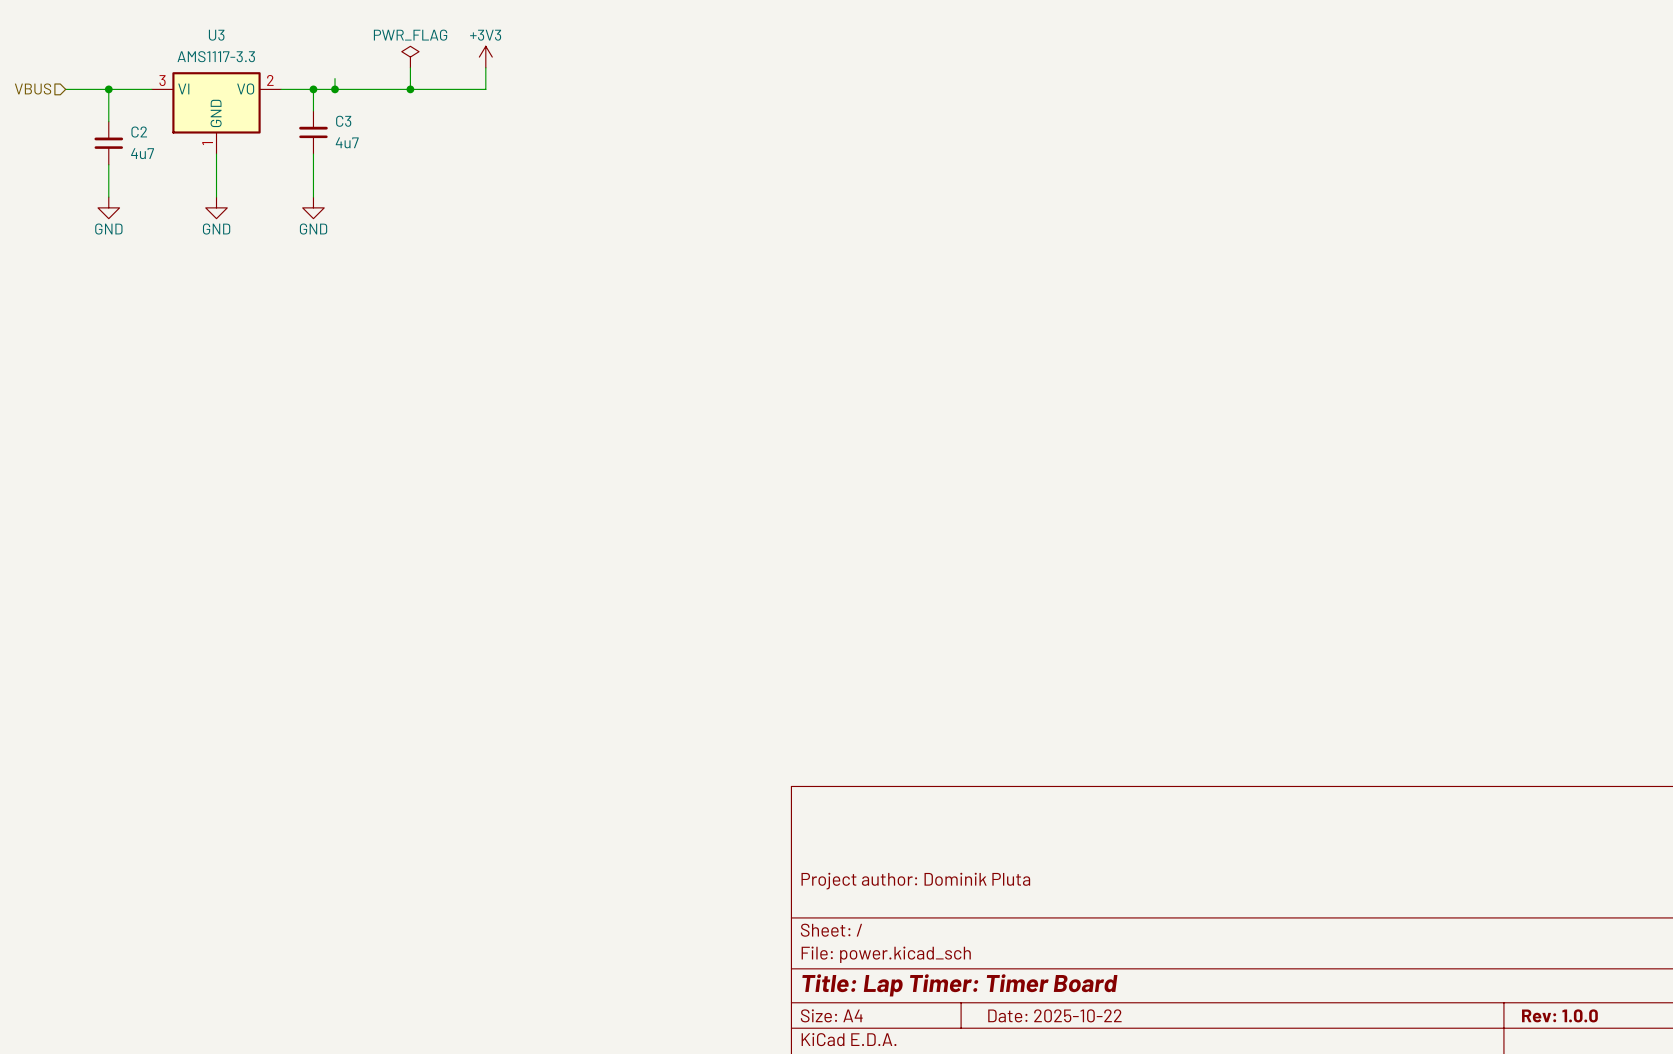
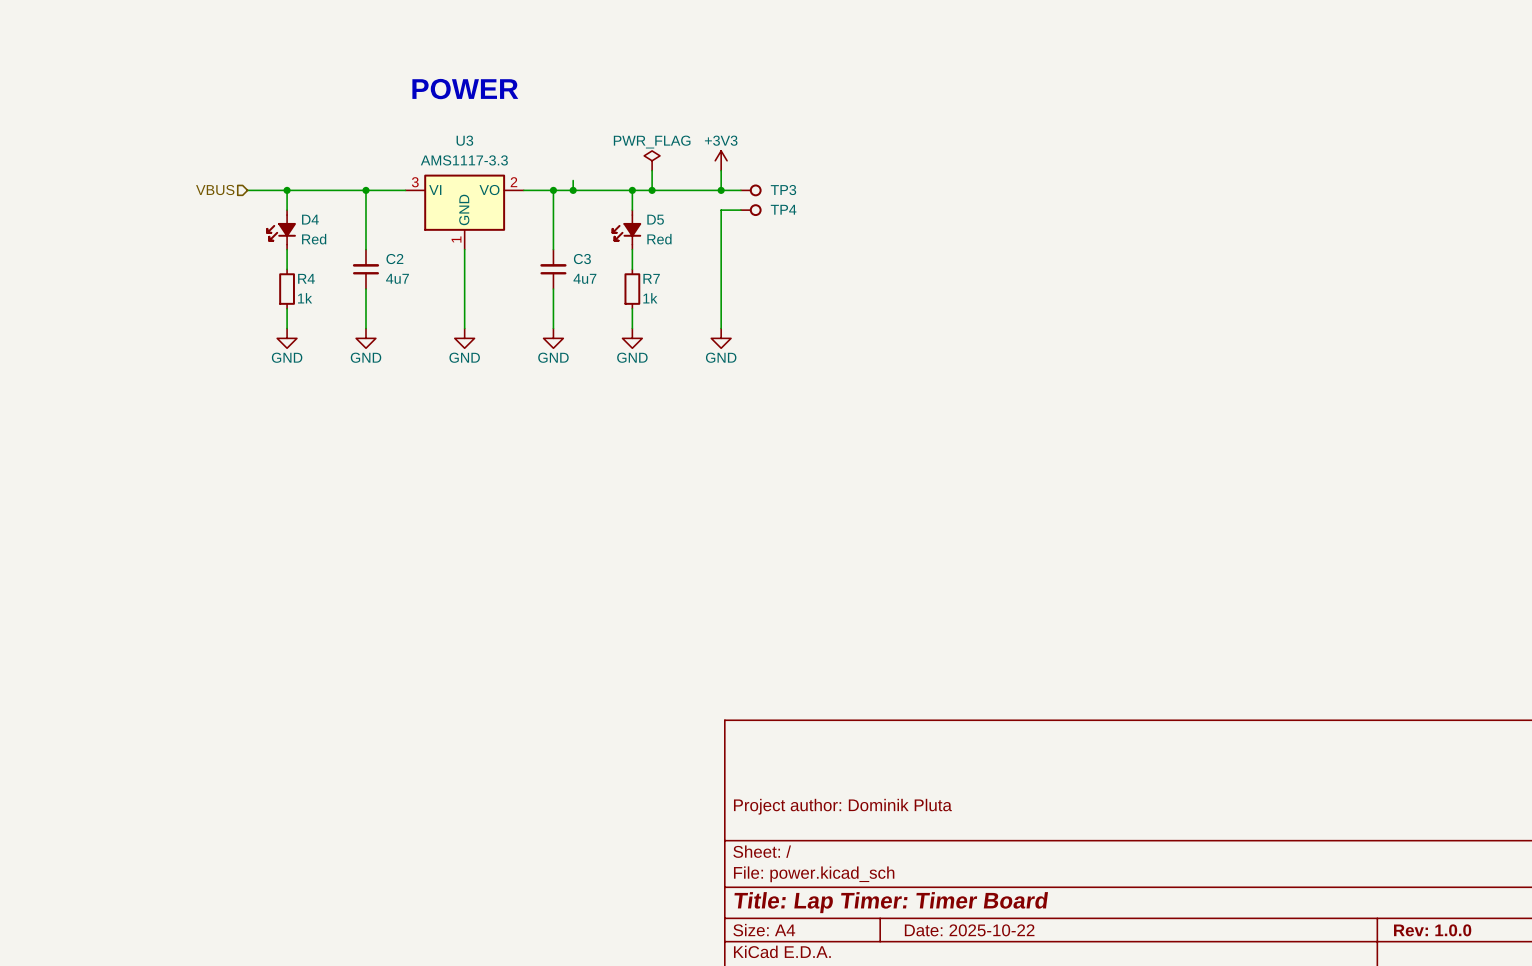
power symbol: PWR_FLAG (410, 57) -> none
power symbol: +3V3 (485, 57) -> none
wire: (410, 67) (410, 89) -> none
wire: (485, 67) (485, 89) (281, 89) -> none
wire: (335, 78) (335, 89) -> none
hierarchical label: VBUS (33, 88) -> none
wire: (65, 89) (151, 89) -> none
wire: (108, 89) (108, 121) -> none
junction: (108, 89) -> none
wire: (313, 89) (313, 110) -> (287, 190) (287, 210)
junction: (313, 89) -> none
junction: (335, 89) -> none
junction: (410, 89) -> none
text: none -> POWER (465, 89)
U3 position: (216, 113) -> (464, 212)
C3 position: (313, 132) -> (553, 269)
C2 position: (108, 143) -> (365, 269)
wire: (216, 154) (216, 197) -> none
wire: (313, 154) (313, 197) -> (365, 289) (365, 328)
wire: (108, 164) (108, 197) -> none
power symbol: none -> PWR_FLAG (652, 160)
power symbol: none -> +3V3 (721, 160)
wire: none -> (652, 170) (652, 190)
wire: none -> (721, 170) (721, 190)
wire: none -> (573, 180) (573, 190)
power symbol: GND (108, 207) -> none
power symbol: GND (216, 207) -> none
hierarchical label: none -> VBUS (215, 190)
wire: none -> (247, 190) (405, 190)
junction: none -> (287, 190)
power symbol: GND (313, 207) -> none
wire: none -> (365, 190) (365, 249)
junction: none -> (365, 190)
wire: none -> (523, 190) (740, 190)
wire: none -> (553, 190) (553, 249)
junction: none -> (553, 190)
junction: none -> (573, 190)
wire: none -> (632, 190) (632, 210)
junction: none -> (632, 190)
junction: none -> (652, 190)
junction: none -> (721, 190)
TP3: none -> (751, 190)
wire: none -> (740, 210) (721, 210) (721, 328)
TP4: none -> (751, 210)
D4: none -> (281, 229)
D5: none -> (626, 229)
wire: none -> (287, 249) (287, 269)
wire: none -> (464, 249) (464, 328)
wire: none -> (632, 249) (632, 269)
R4: none -> (287, 289)
wire: none -> (553, 289) (553, 328)
R7: none -> (632, 289)
wire: none -> (287, 308) (287, 328)
wire: none -> (632, 308) (632, 328)
power symbol: none -> GND (287, 338)
power symbol: none -> GND (365, 338)
power symbol: none -> GND (464, 338)
power symbol: none -> GND (553, 338)
power symbol: none -> GND (632, 338)
power symbol: none -> GND (721, 338)

